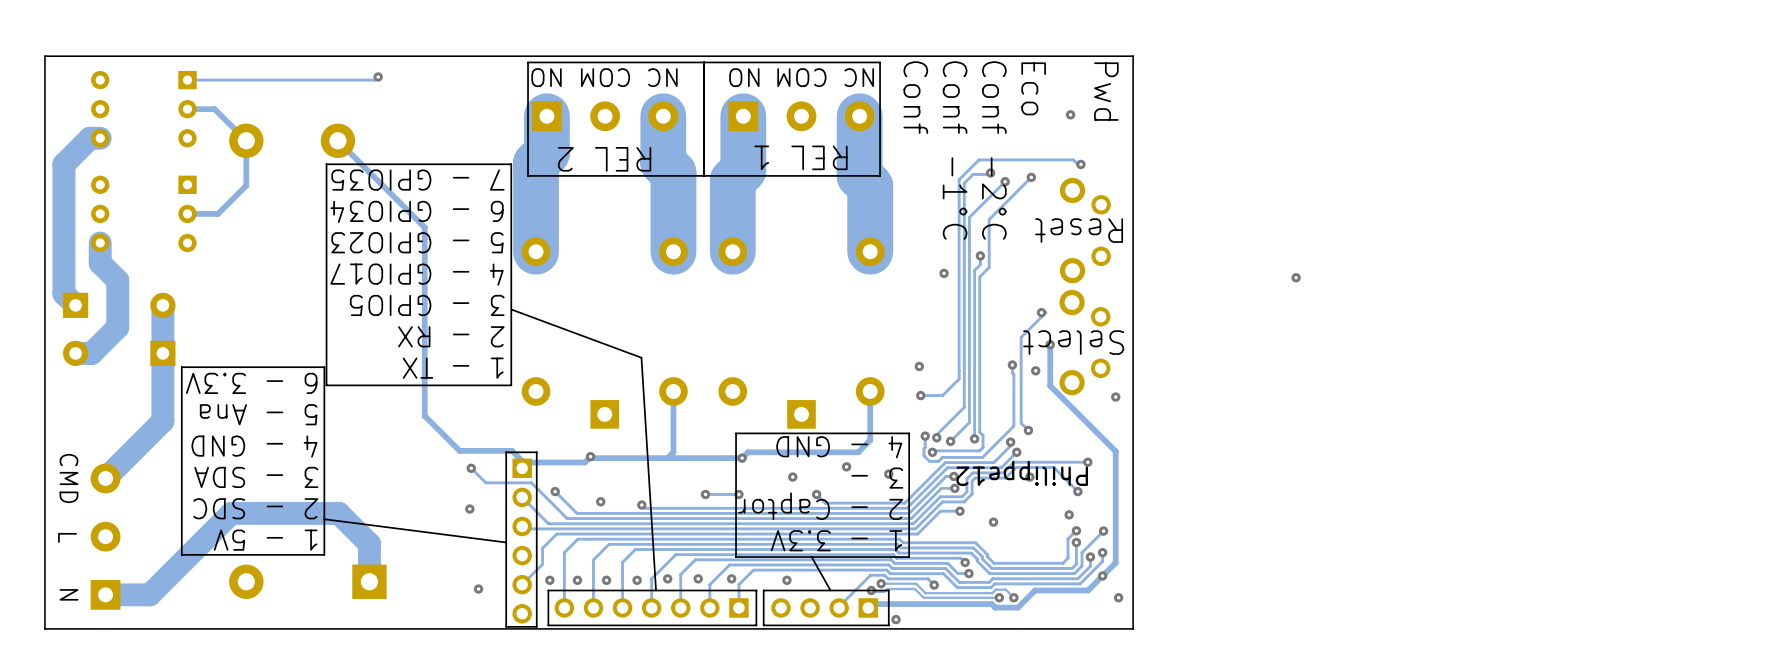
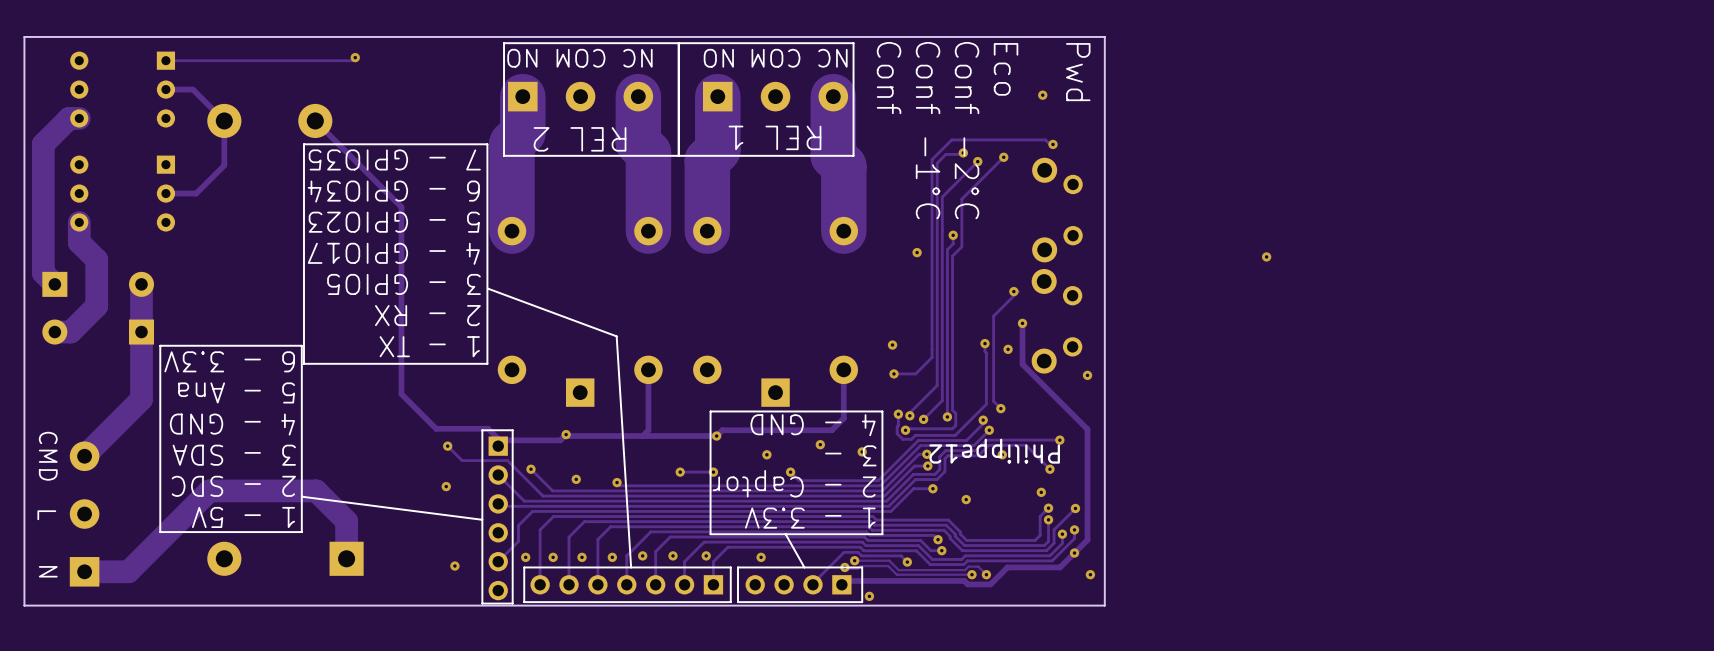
text: Reset (1079, 230) -> none
text: Select (1073, 342) -> none

